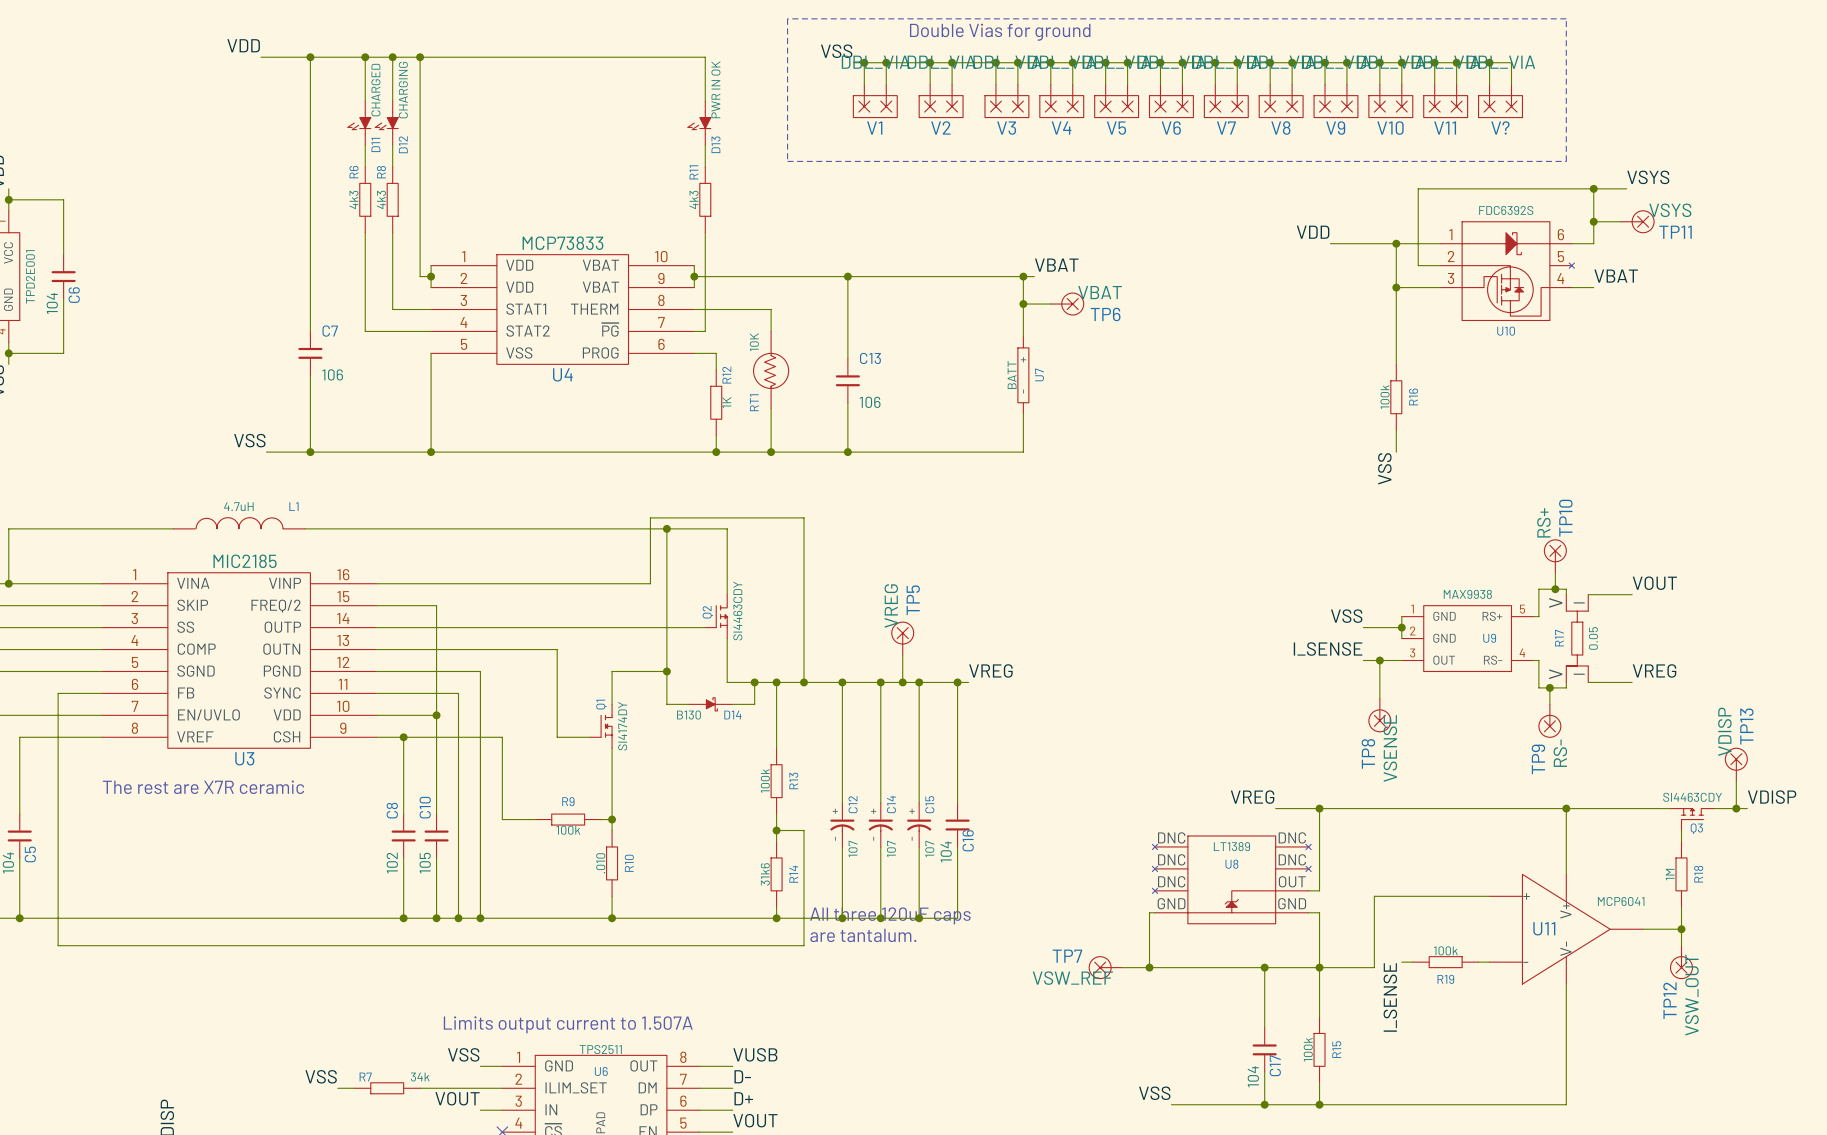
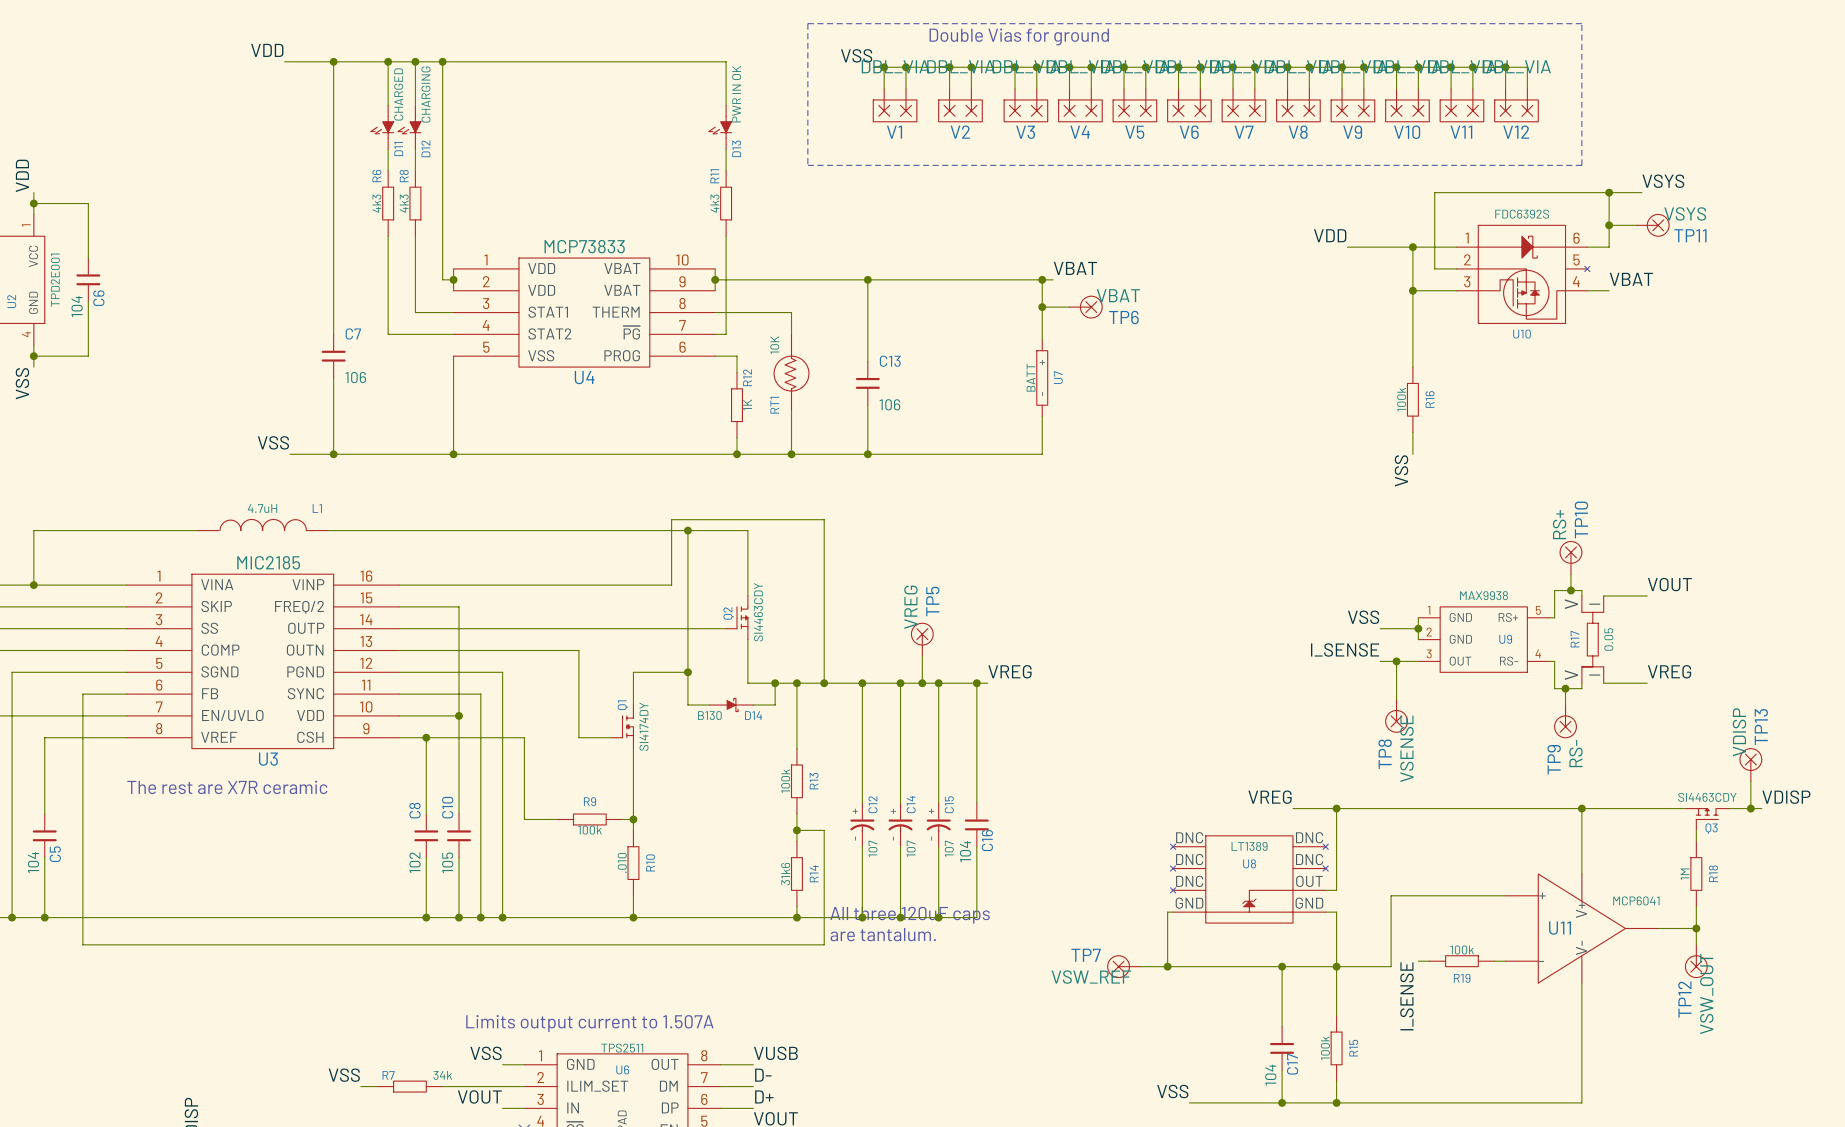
V? name: V? (1500, 127) -> V12 (1516, 132)

